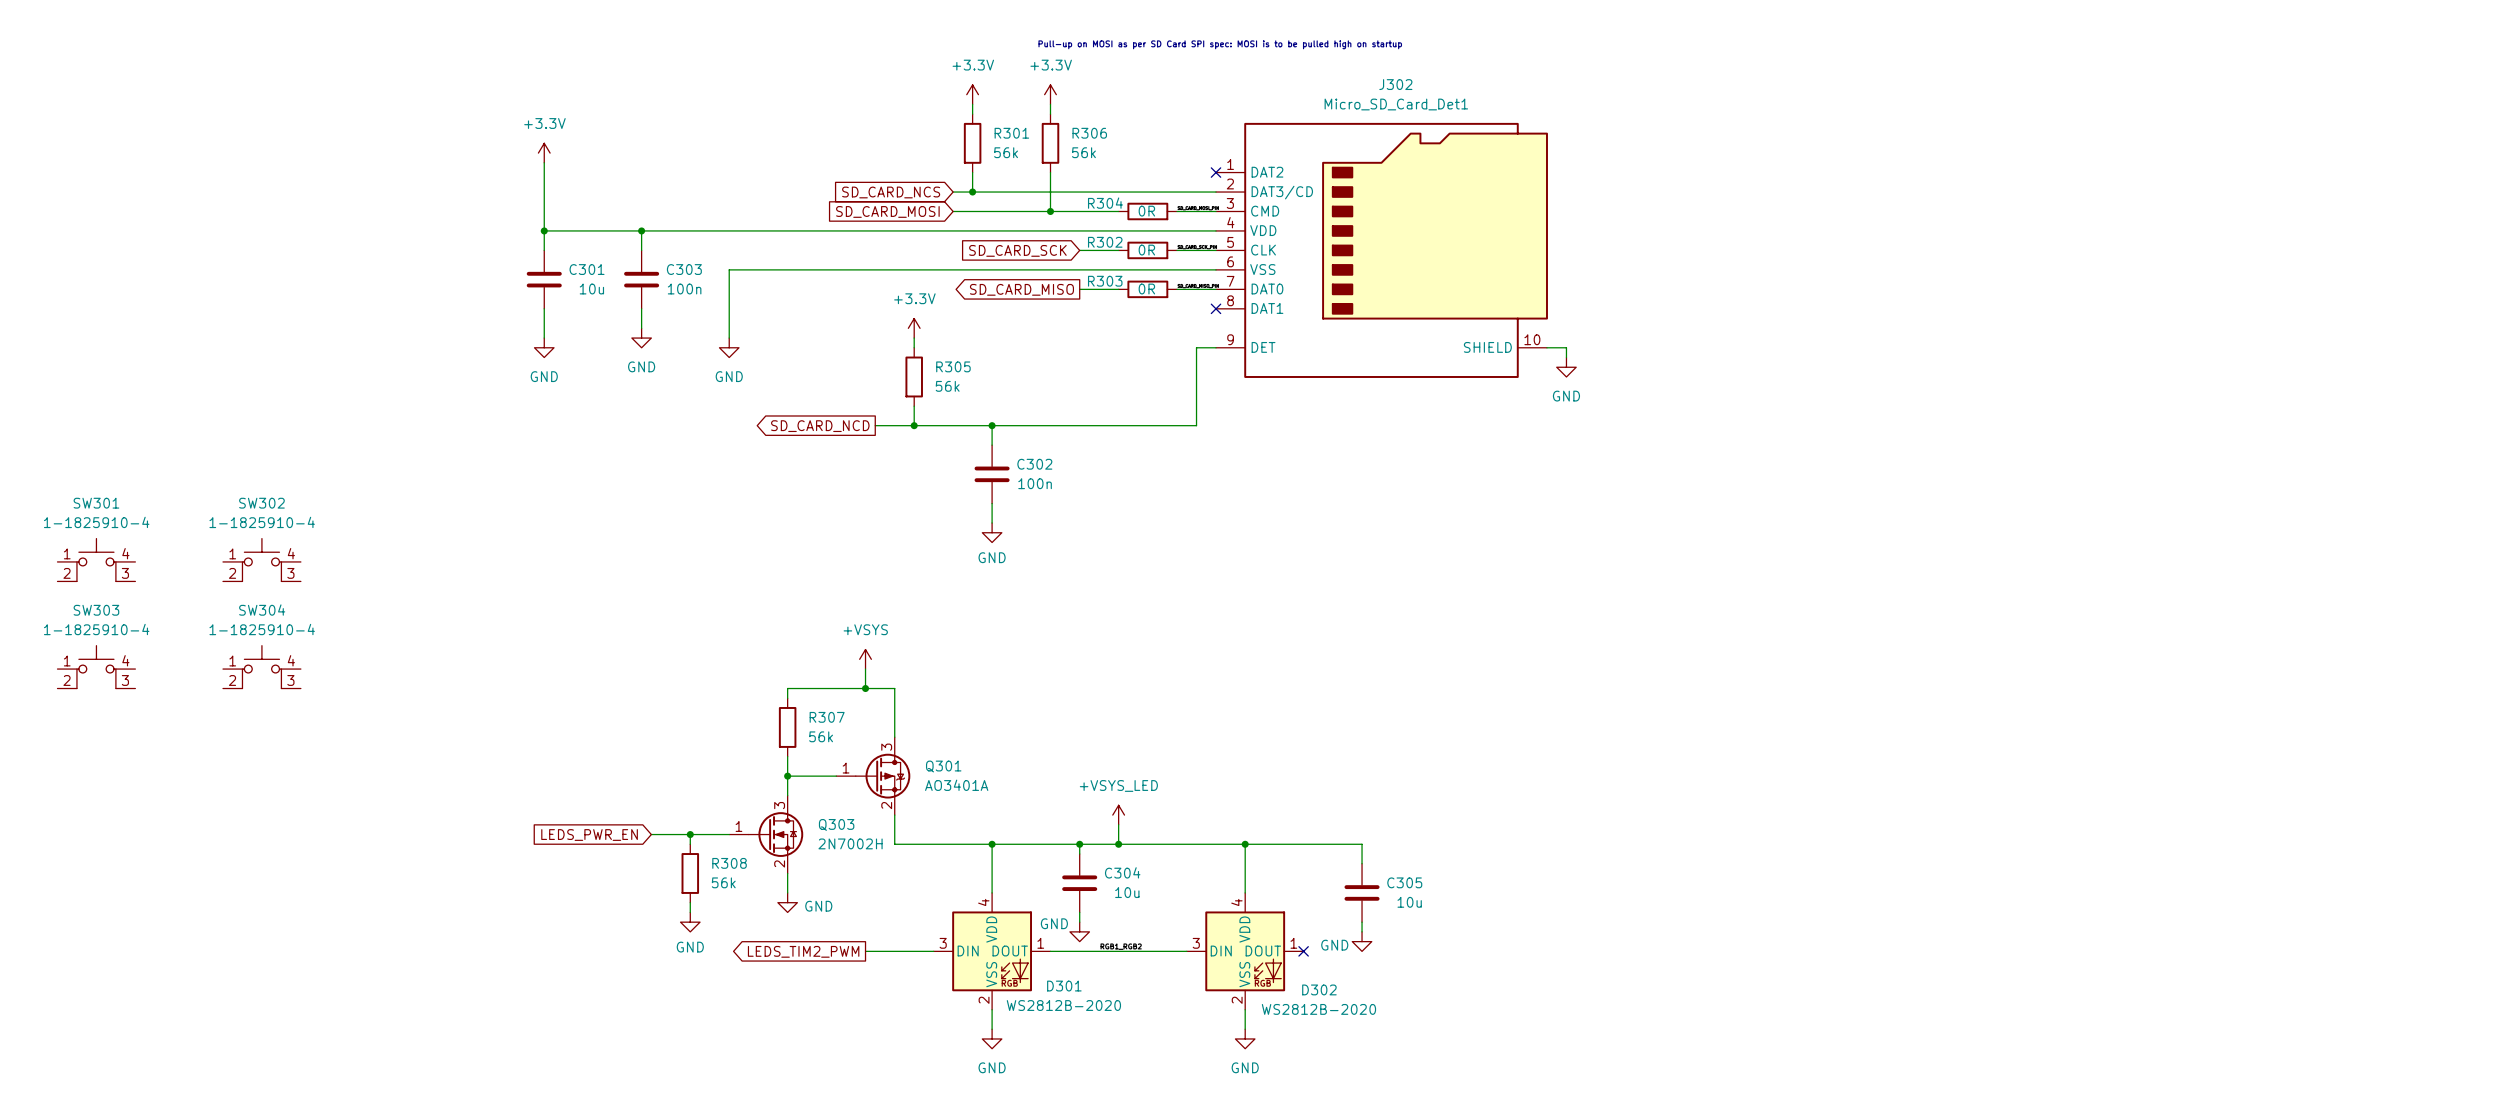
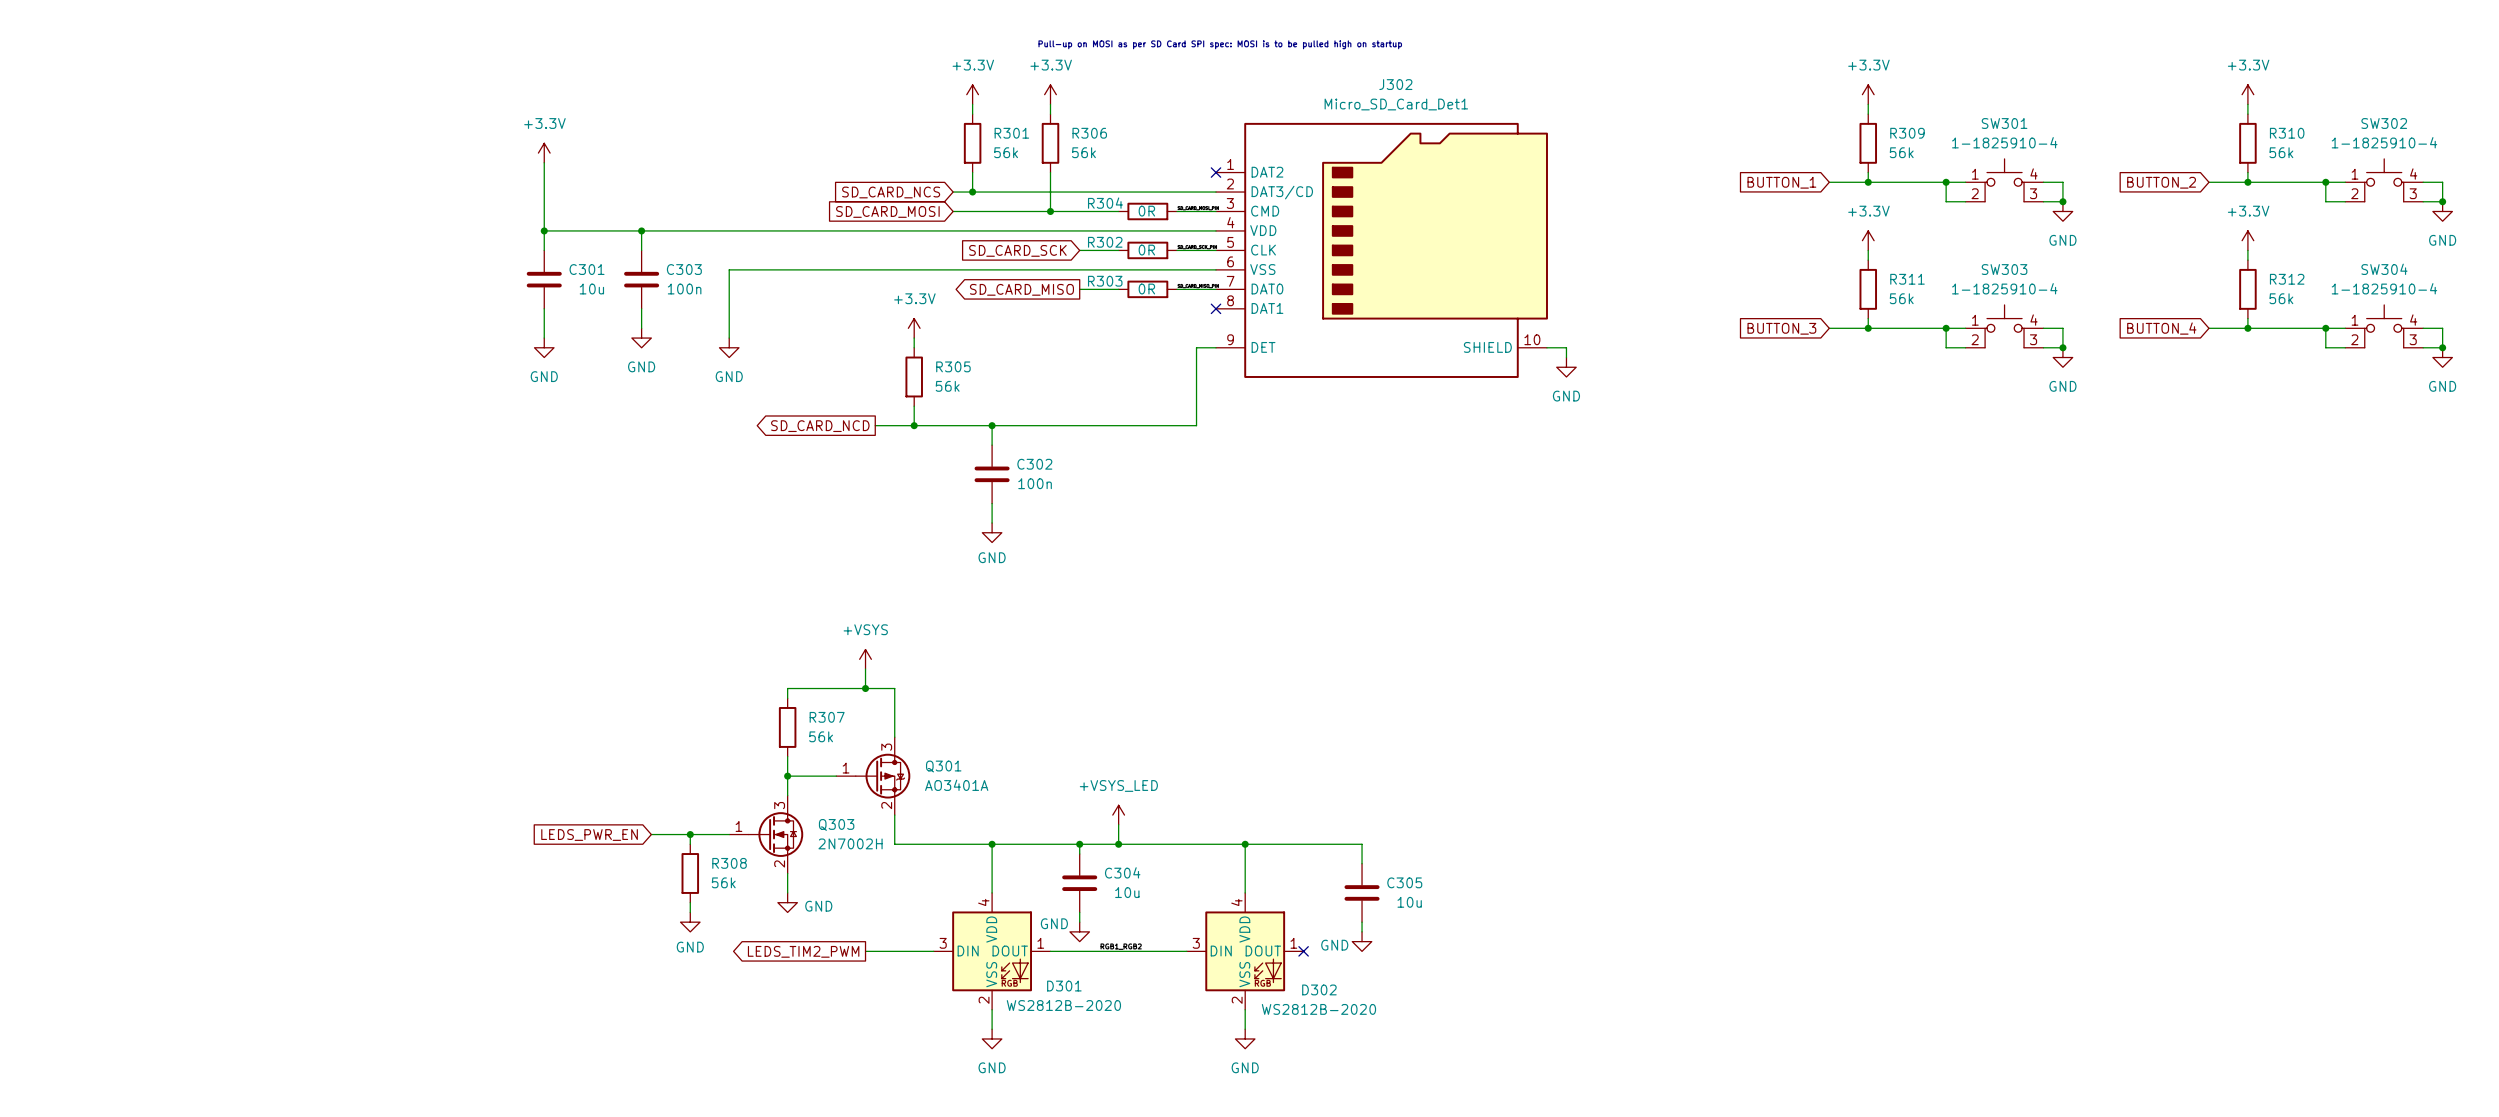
power symbol: none -> +3.3V (1868, 94)
power symbol: none -> +3.3V (2247, 94)
wire: none -> (1868, 104) (1868, 114)
wire: none -> (2247, 104) (2247, 114)
R309: none -> 56k (1868, 143)
R310: none -> 56k (2247, 143)
wire: none -> (1868, 172) (1868, 182)
wire: none -> (2247, 172) (2247, 182)
global label: none -> BUTTON_1 (1781, 182)
wire: none -> (1829, 182) (1965, 182)
junction: none -> (1868, 182)
wire: none -> (1946, 182) (1946, 201) (1965, 201)
junction: none -> (1946, 182)
wire: none -> (2043, 182) (2062, 182) (2062, 201) (2043, 201)
global label: none -> BUTTON_2 (2161, 182)
wire: none -> (2208, 182) (2345, 182)
junction: none -> (2247, 182)
wire: none -> (2325, 182) (2325, 201) (2345, 201)
junction: none -> (2325, 182)
wire: none -> (2423, 182) (2442, 182) (2442, 201) (2423, 201)
junction: none -> (2062, 201)
junction: none -> (2442, 201)
power symbol: none -> GND (2062, 211)
power symbol: none -> GND (2442, 211)
power symbol: none -> +3.3V (1868, 240)
power symbol: none -> +3.3V (2247, 240)
wire: none -> (1868, 250) (1868, 260)
wire: none -> (2247, 250) (2247, 260)
R311: none -> 56k (1868, 289)
R312: none -> 56k (2247, 289)
wire: none -> (1868, 318) (1868, 328)
wire: none -> (2247, 318) (2247, 328)
global label: none -> BUTTON_3 (1781, 328)
wire: none -> (1829, 328) (1965, 328)
junction: none -> (1868, 328)
wire: none -> (1946, 328) (1946, 347) (1965, 347)
junction: none -> (1946, 328)
wire: none -> (2043, 328) (2062, 328) (2062, 347) (2043, 347)
global label: none -> BUTTON_4 (2161, 328)
wire: none -> (2208, 328) (2345, 328)
junction: none -> (2247, 328)
wire: none -> (2325, 328) (2325, 347) (2345, 347)
junction: none -> (2325, 328)
wire: none -> (2423, 328) (2442, 328) (2442, 347) (2423, 347)
junction: none -> (2062, 347)
junction: none -> (2442, 347)
power symbol: none -> GND (2062, 357)
power symbol: none -> GND (2442, 357)
SW301 position: (96, 560) -> (2004, 180)
SW302 position: (261, 560) -> (2384, 180)
SW303 position: (96, 667) -> (2004, 326)
SW304 position: (261, 667) -> (2384, 326)

